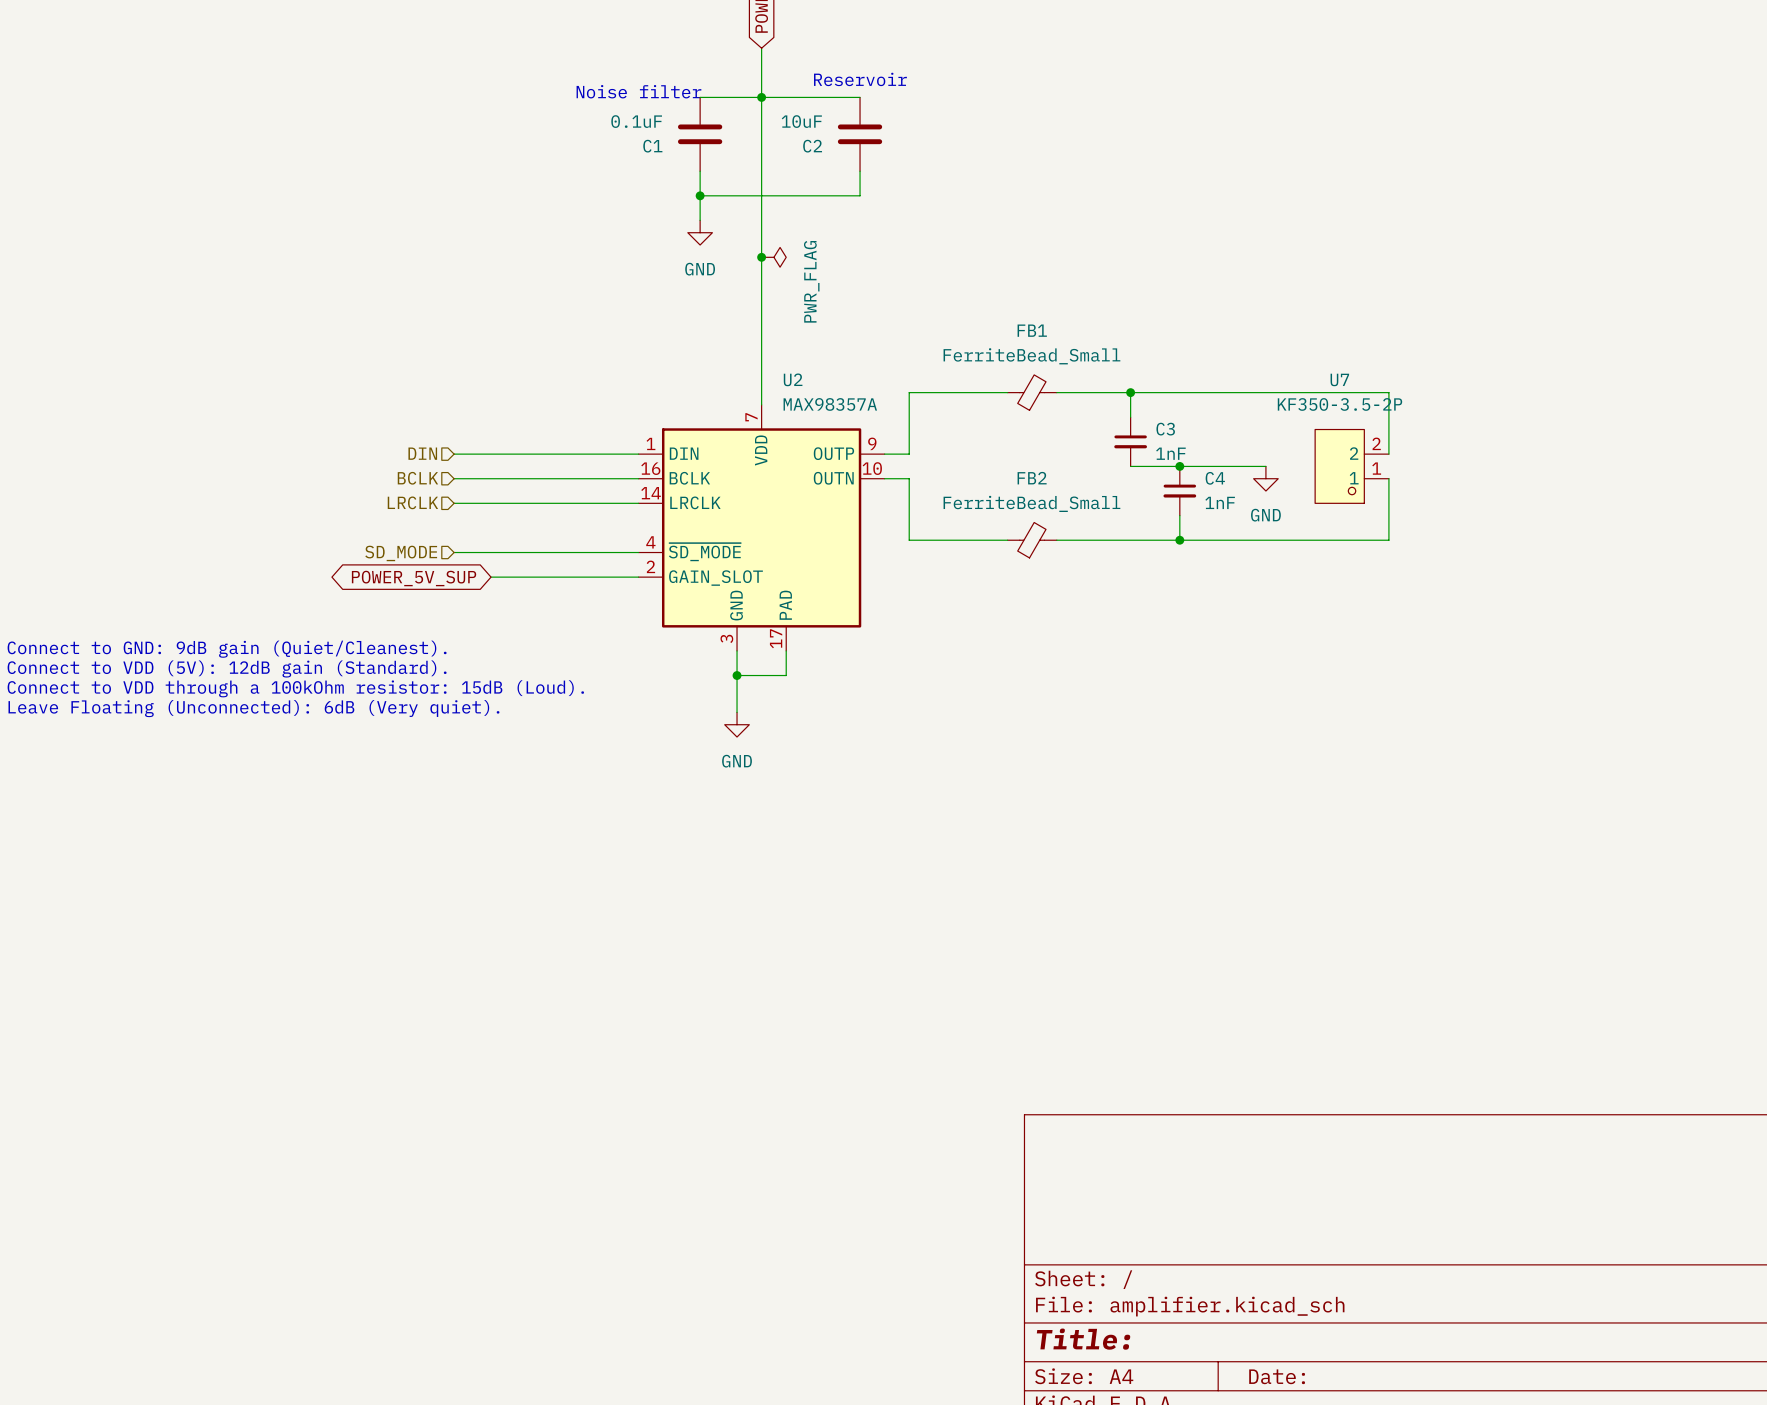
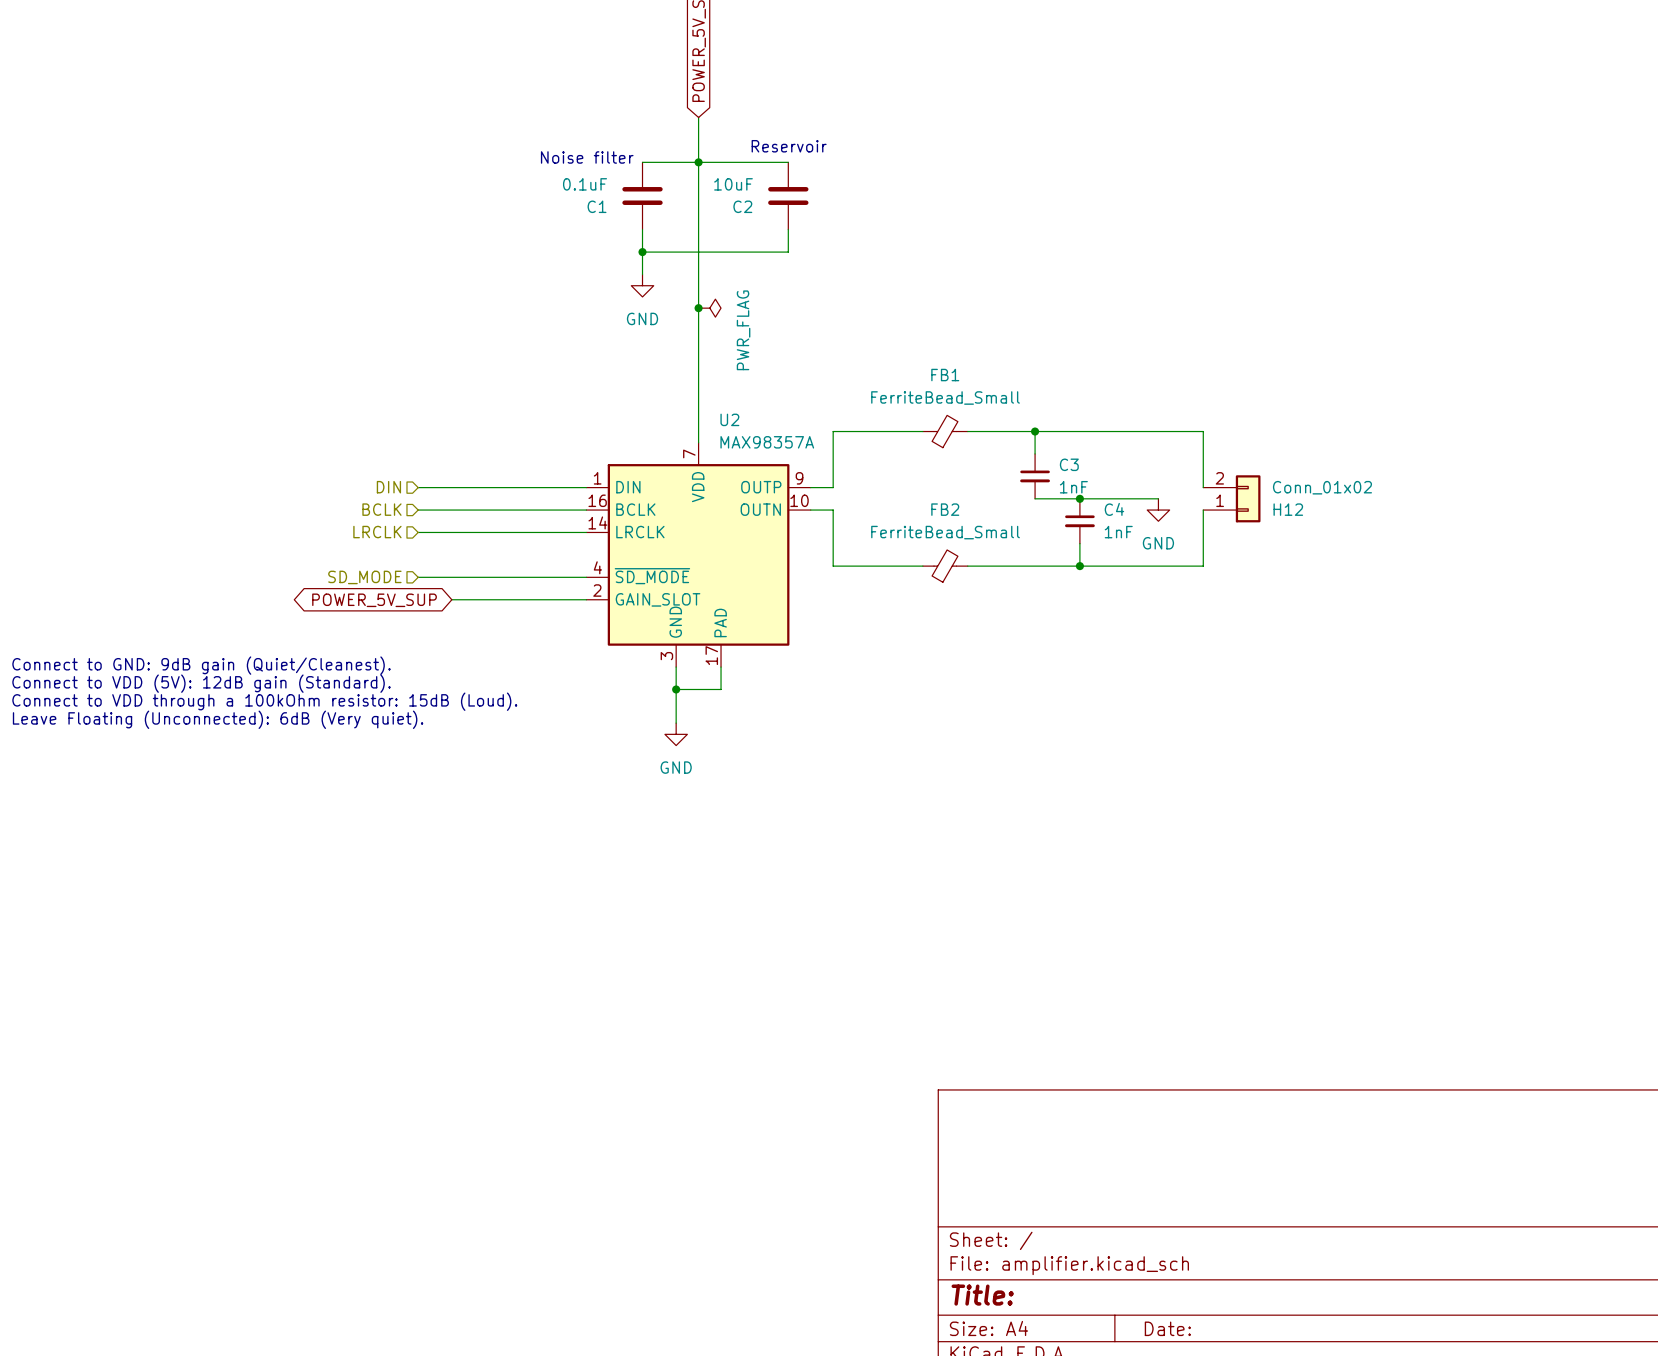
wire: (1315, 392) (1388, 392) (1388, 454) -> (1203, 431) (1203, 487)
H12: none -> Conn_01x02 (1231, 498)
U7: KF350-3.5-2P (1352, 466) -> none
wire: (1388, 478) (1388, 540) (1315, 540) -> (1203, 510) (1203, 566)

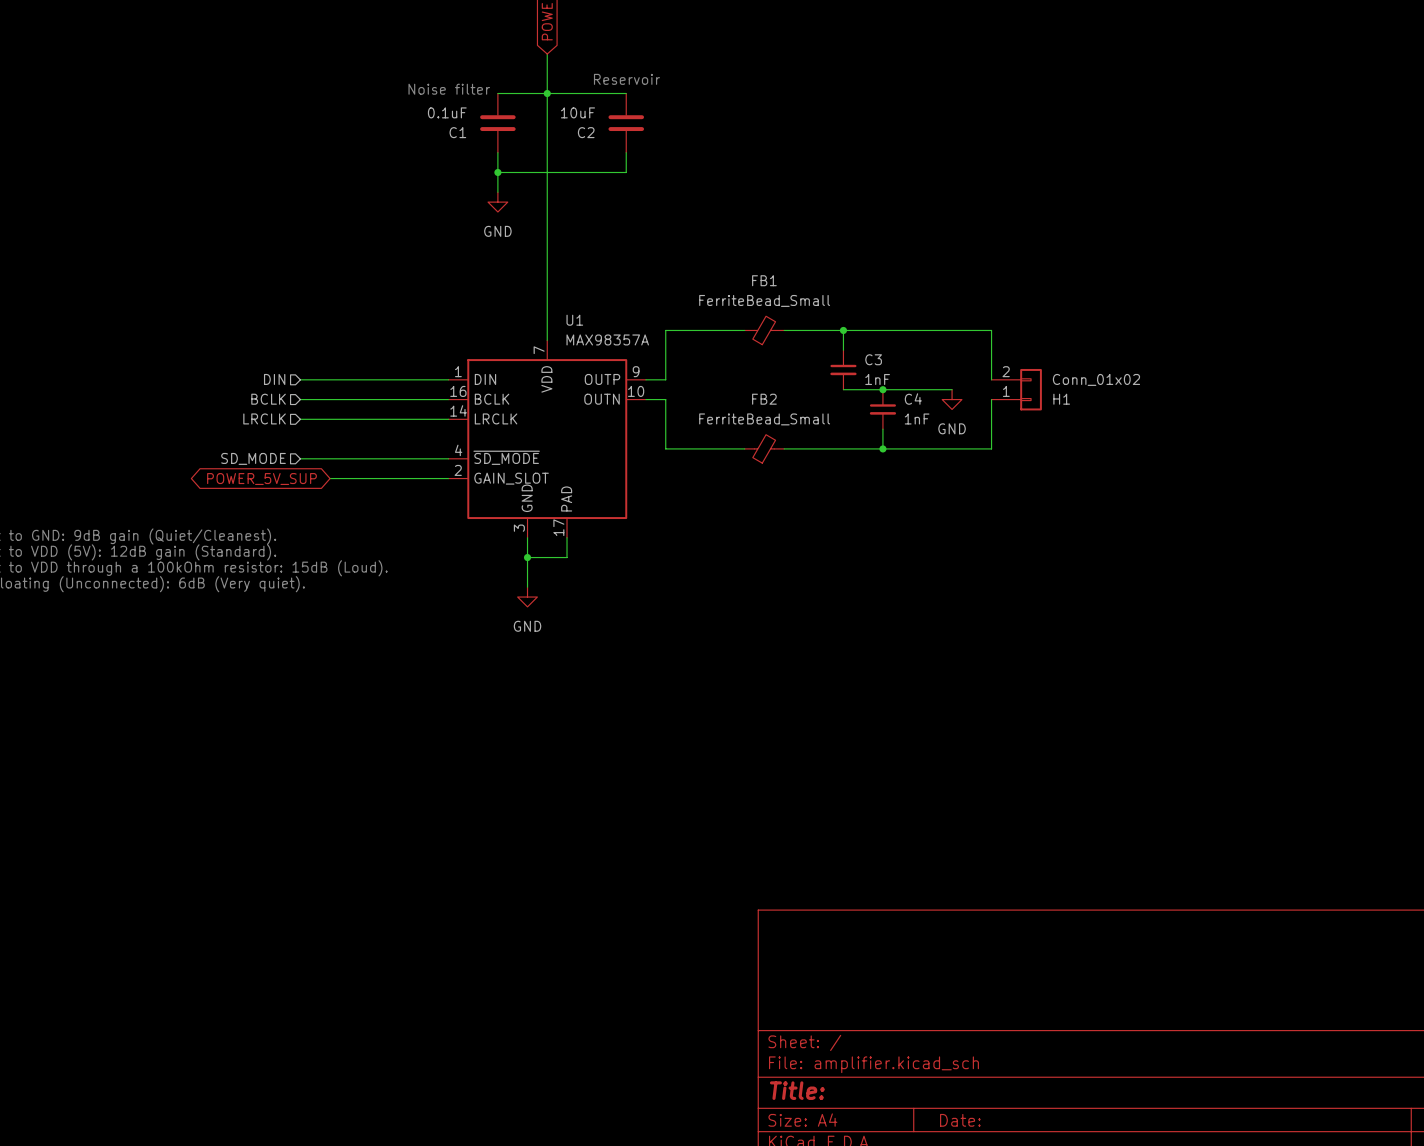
junction: (698, 308) -> none
power symbol: PWR_FLAG (709, 308) -> none
U2 name: U2 (729, 419) -> U1 (574, 320)
H12 name: H12 (1288, 509) -> H1 (1061, 399)

